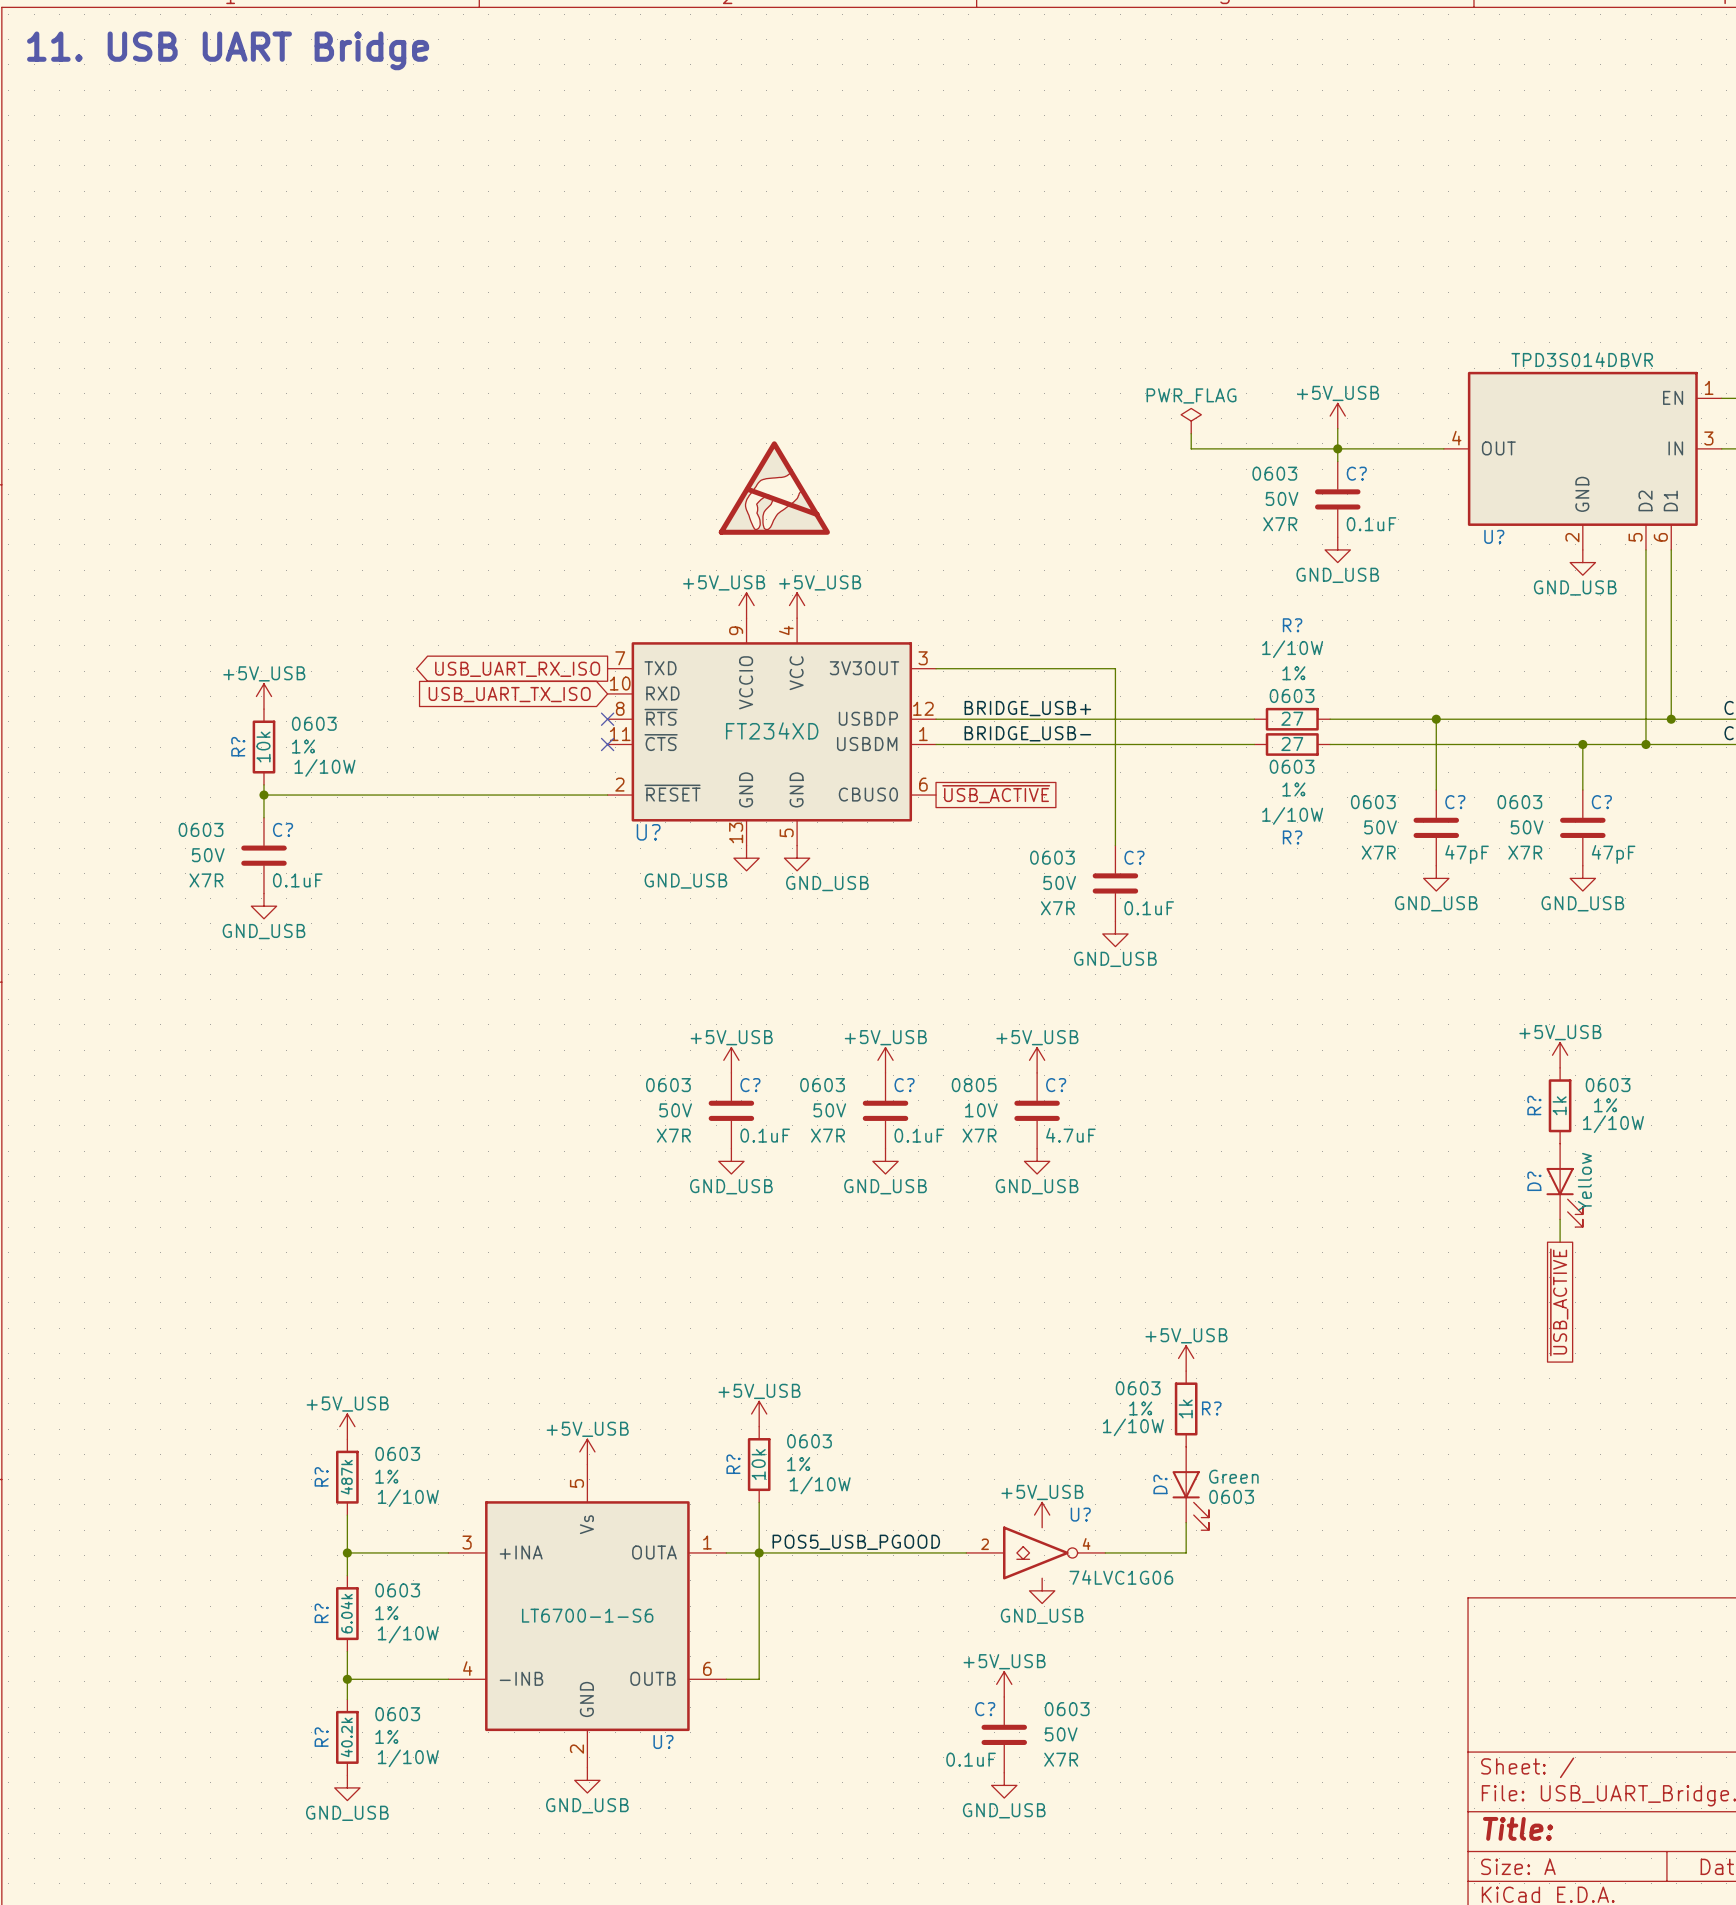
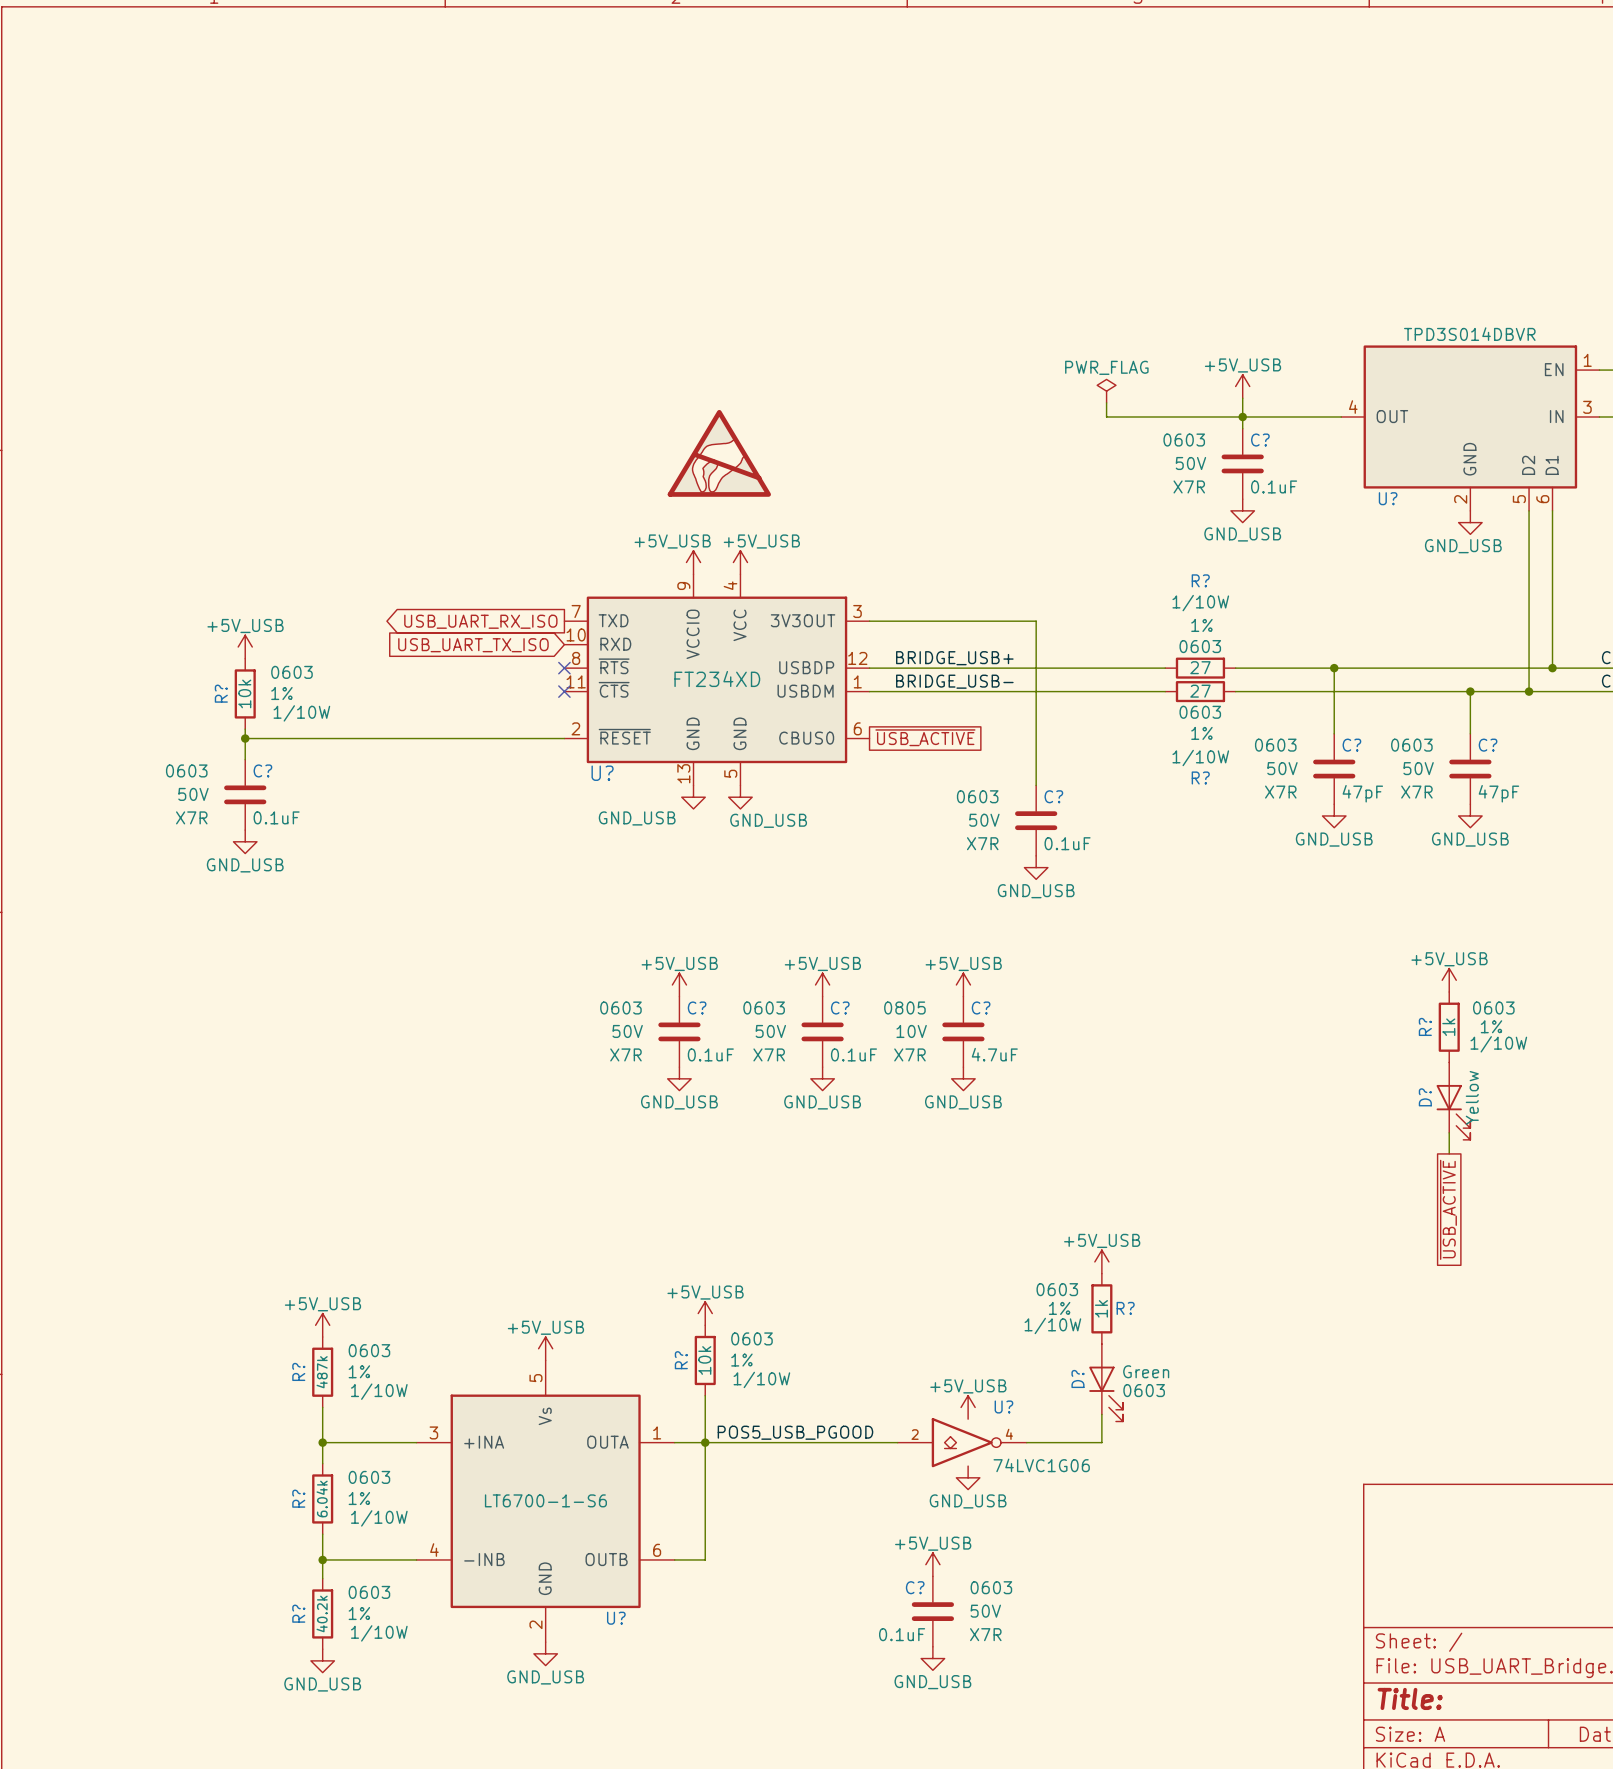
text: 11. USB UART Bridge (228, 50) -> none

